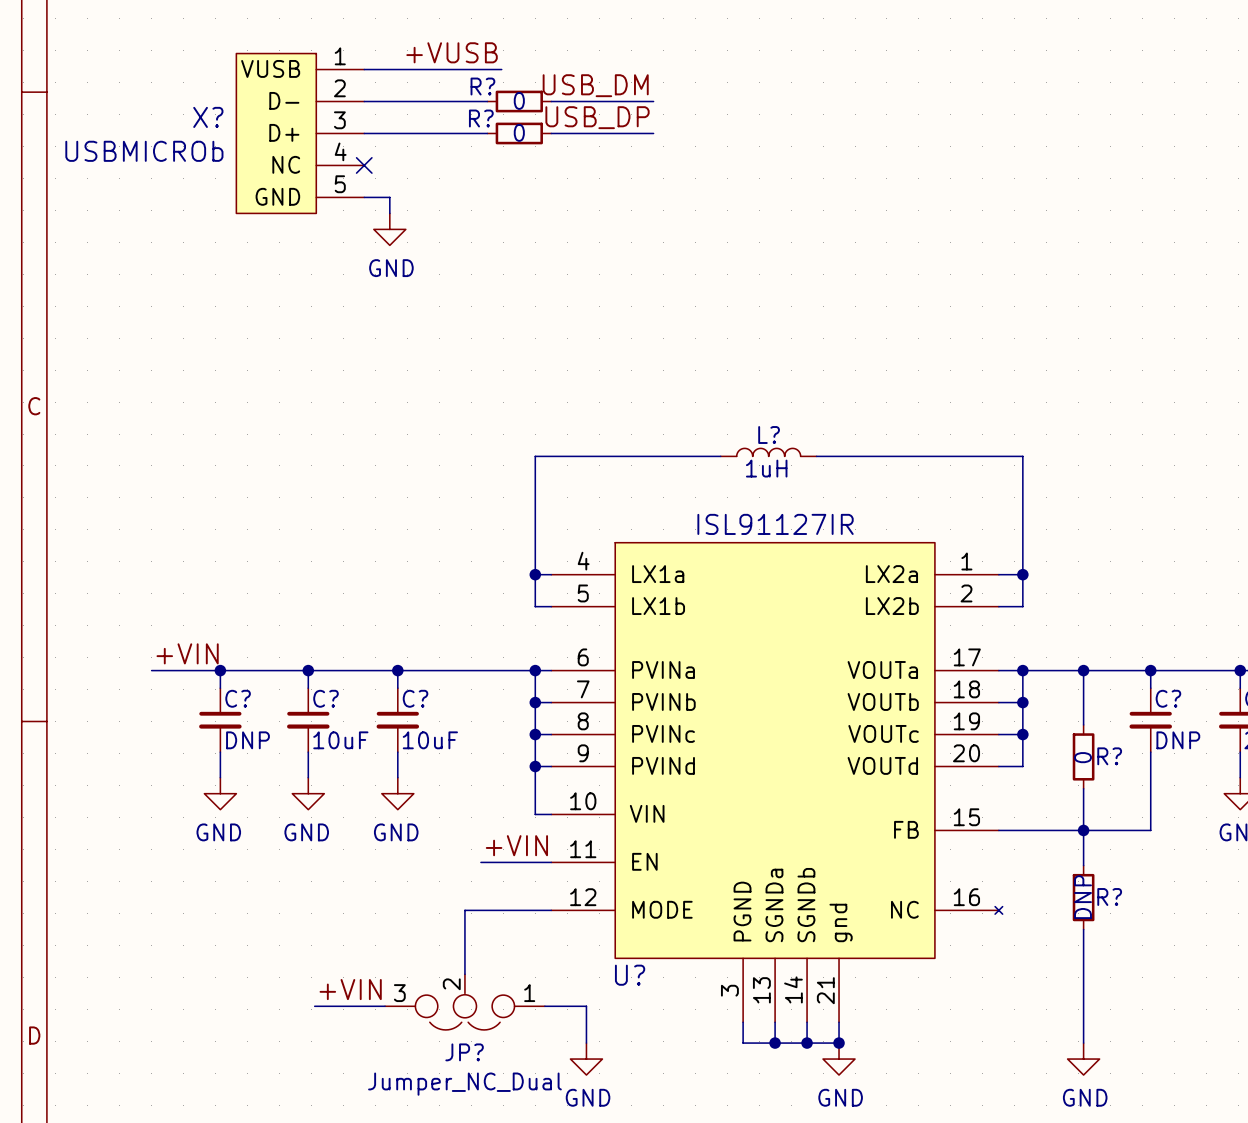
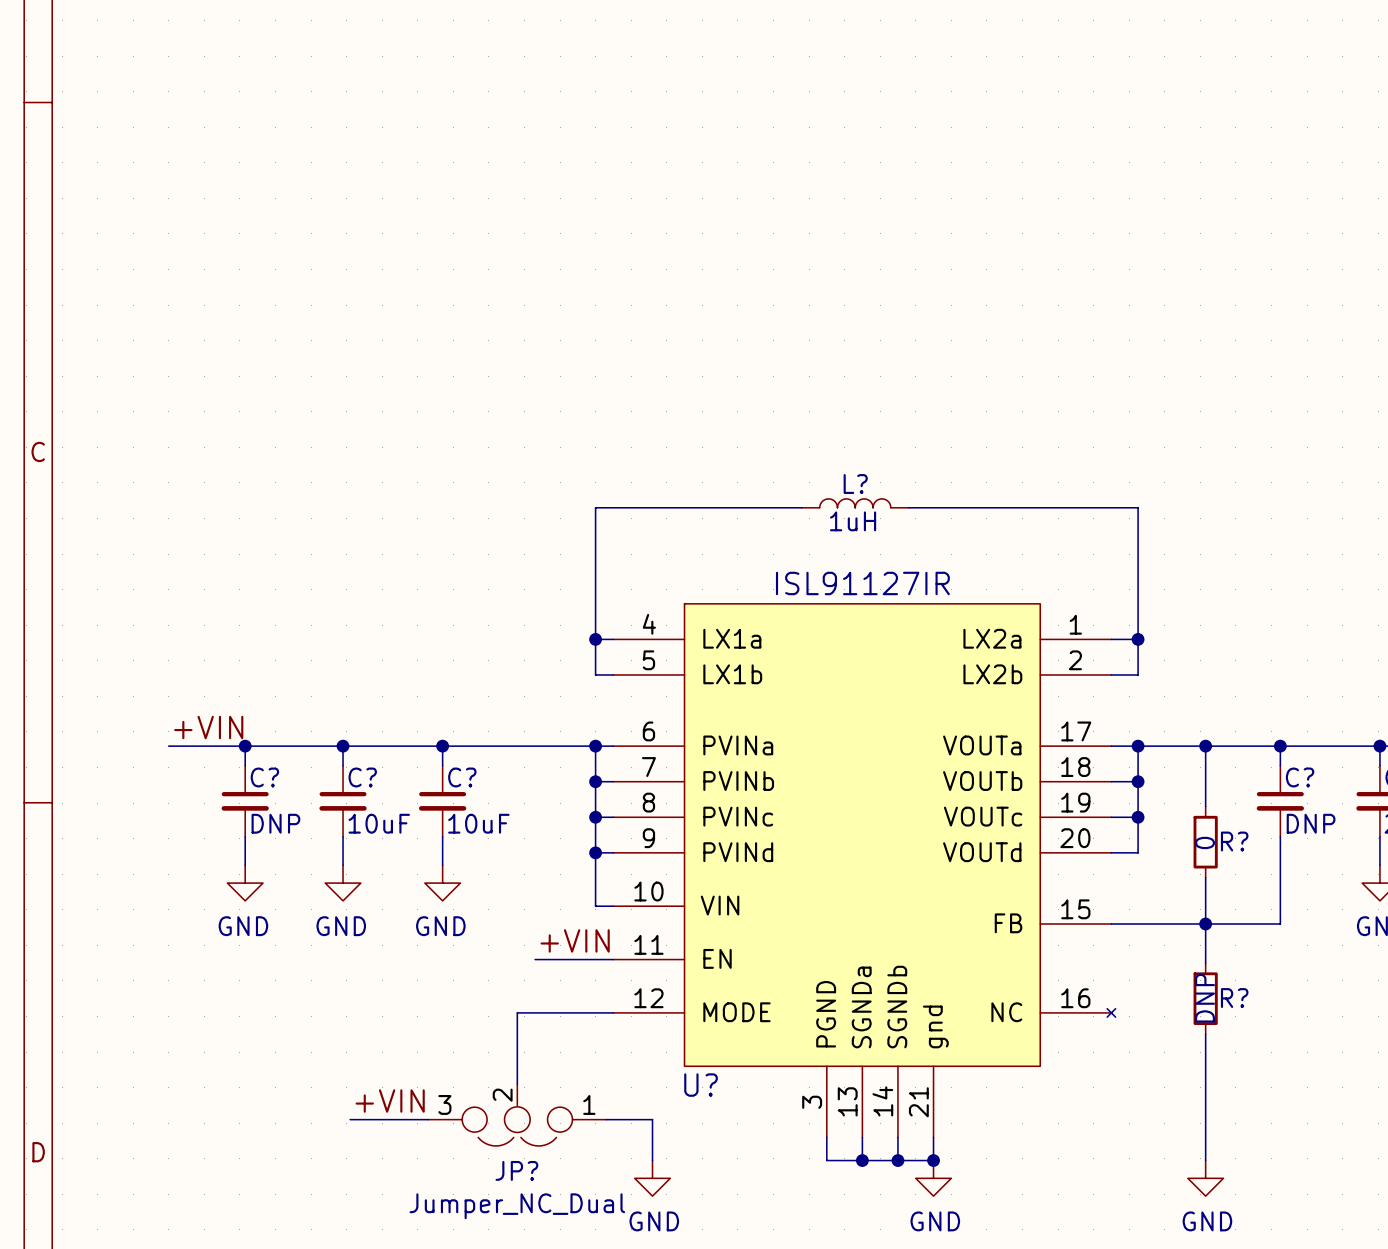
label: +VUSB (452, 52) -> none
wire: (364, 69) (501, 69) -> none
label: USB_DM (595, 85) -> none
wire: (364, 101) (487, 101) -> none
R?: 0 (519, 101) -> none
wire: (551, 101) (653, 101) -> none
label: USB_DP (597, 117) -> none
X?: USBMICROb (300, 133) -> none
wire: (364, 133) (487, 133) -> none
R?: 0 (519, 133) -> none
wire: (551, 133) (653, 133) -> none
no-connect mark: (364, 165) -> none
wire: (364, 197) (389, 197) (389, 213) -> none
power symbol: GND (389, 229) -> none

